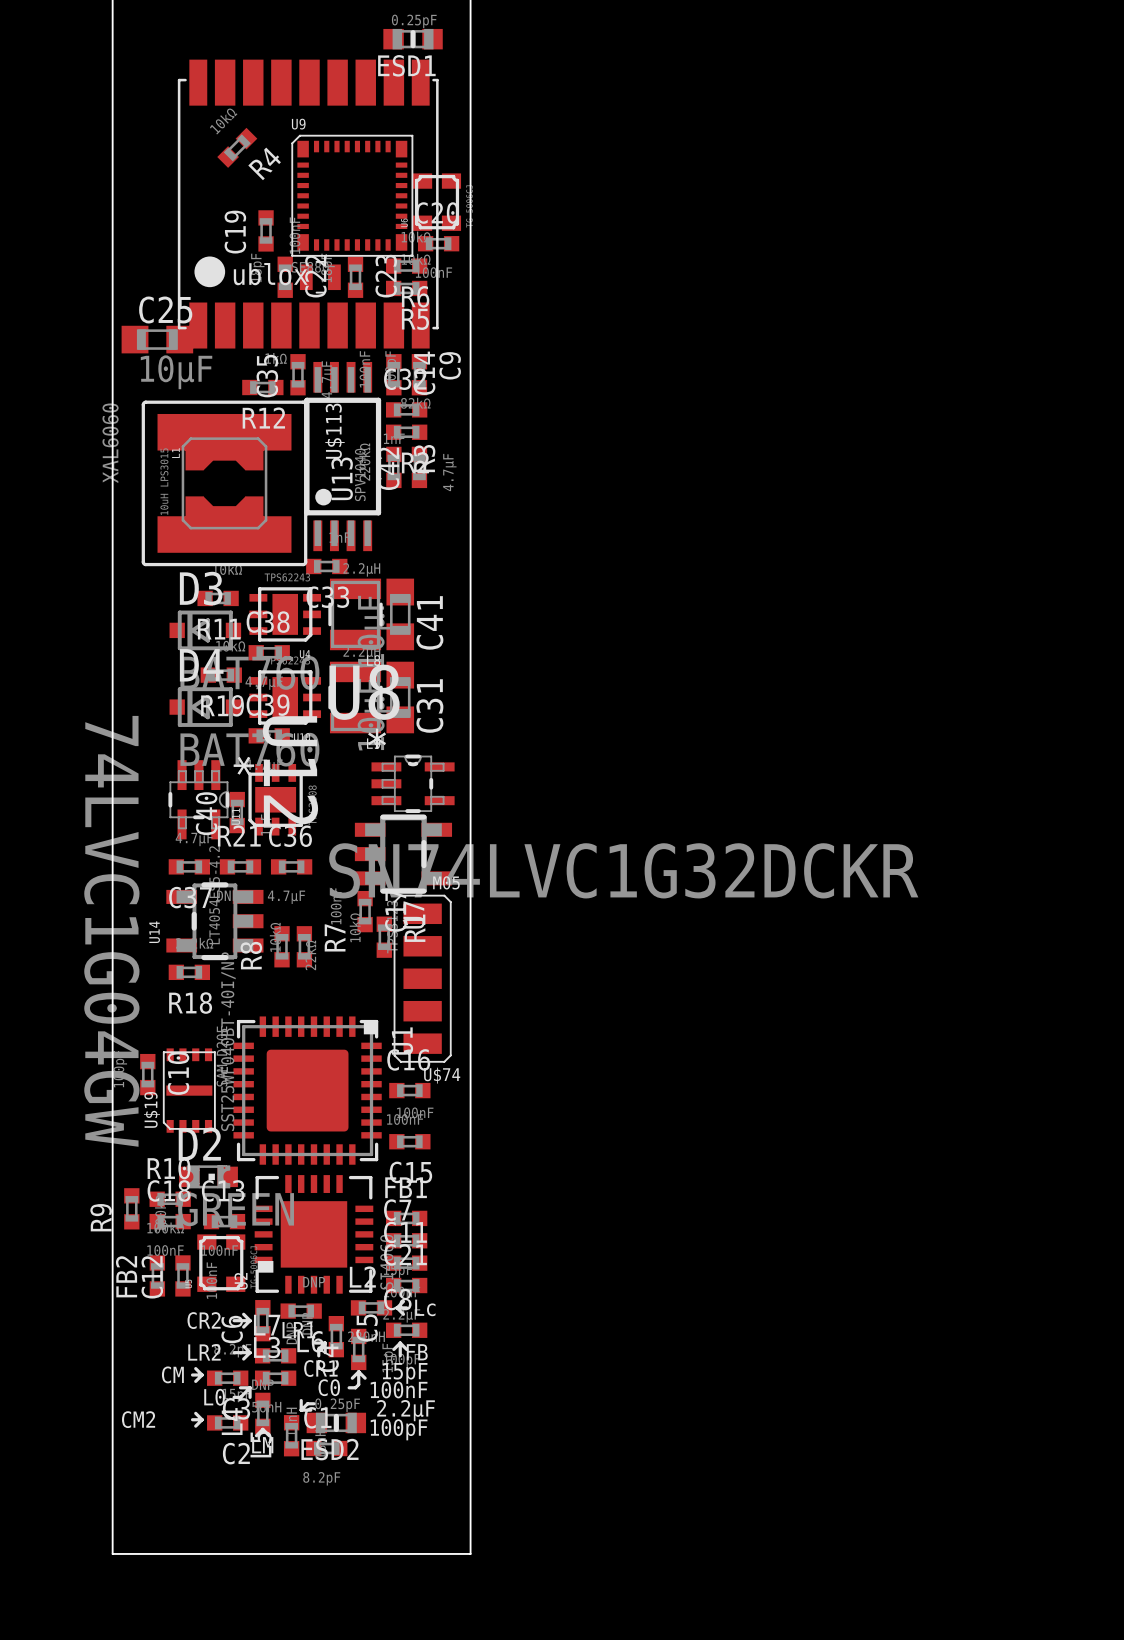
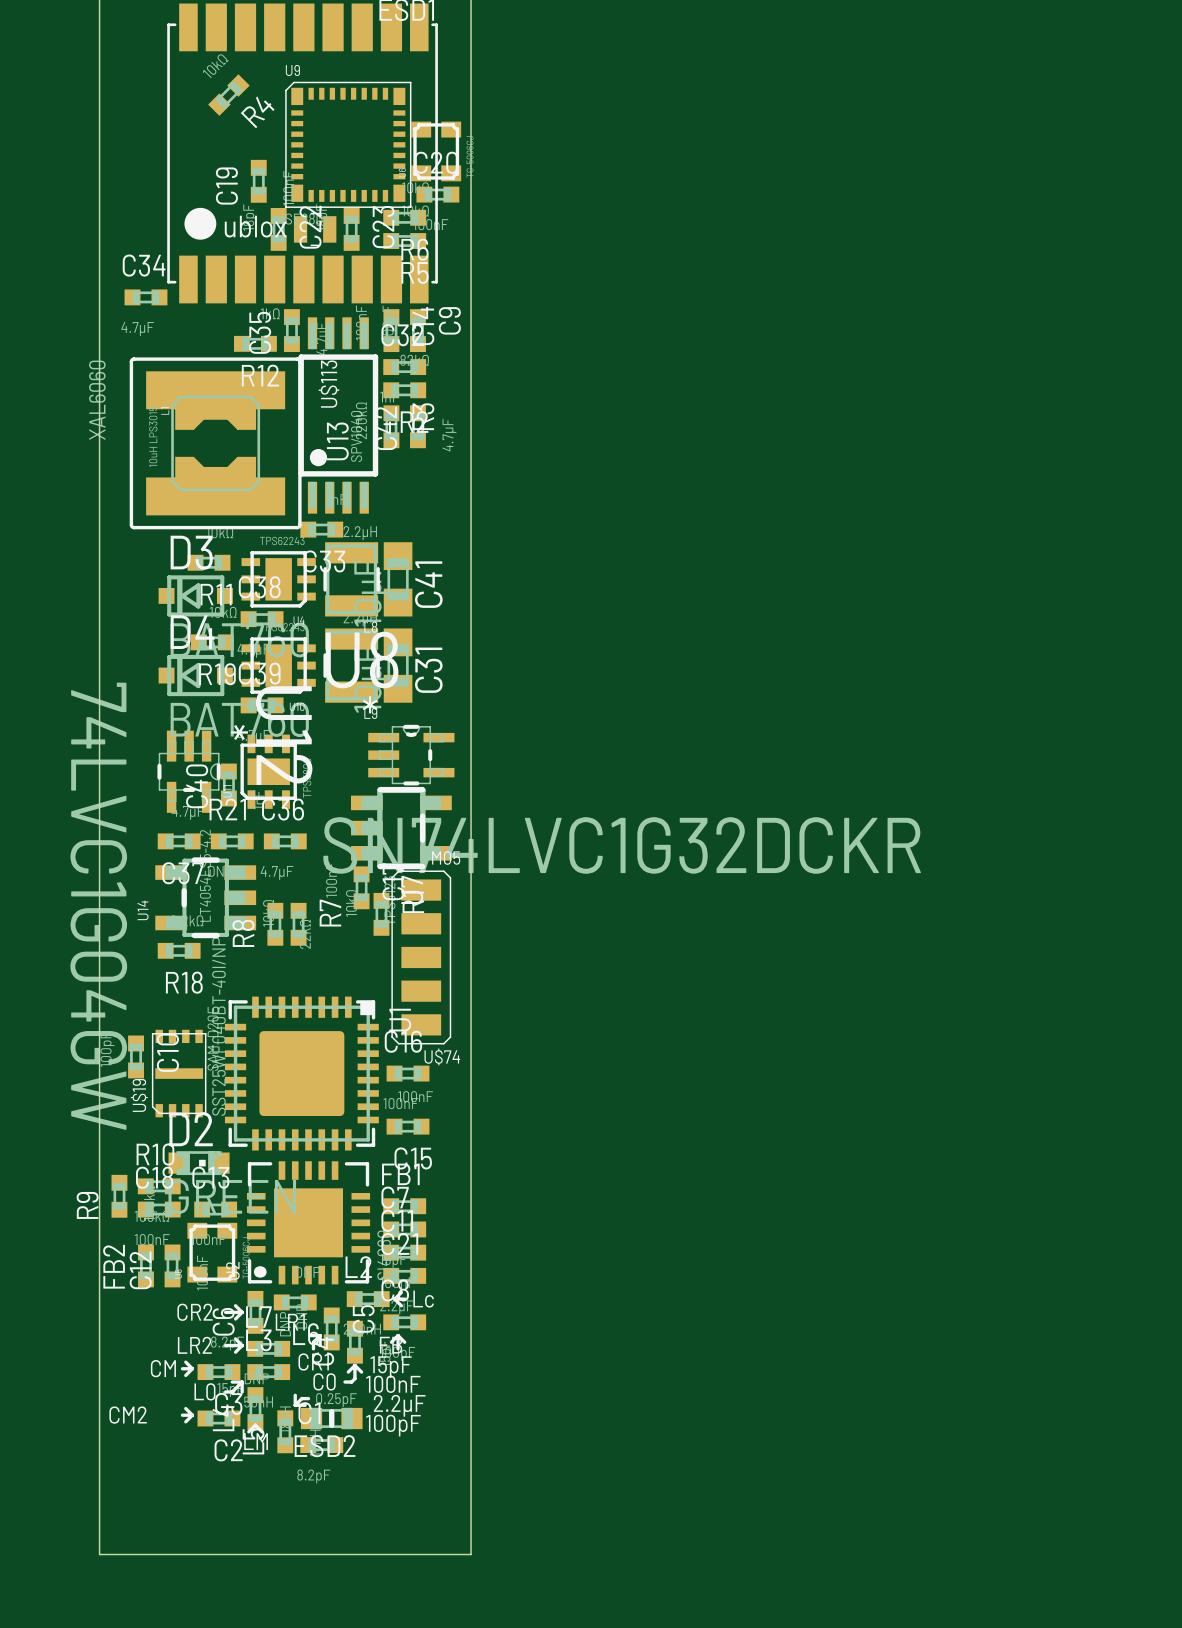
C25: 10µF (157, 339) -> none
C34: none -> 4.7µF (145, 297)

